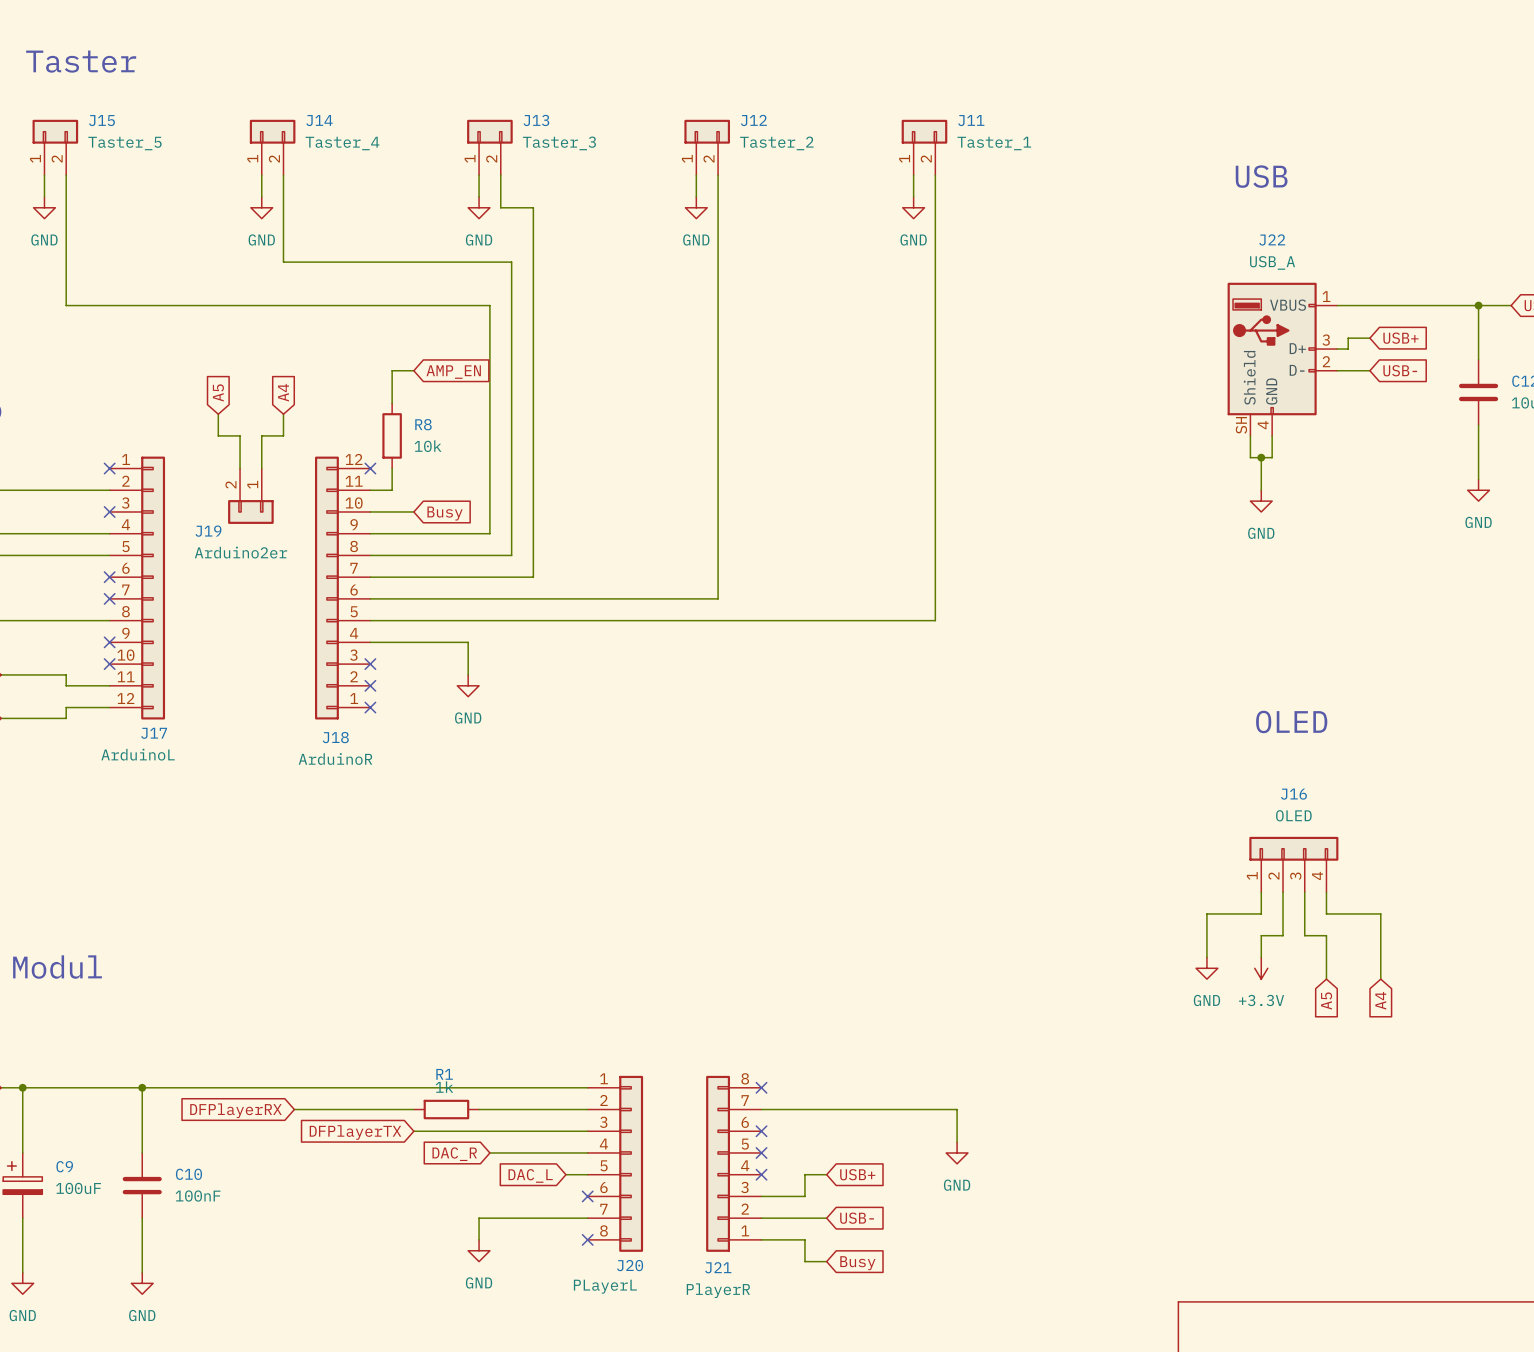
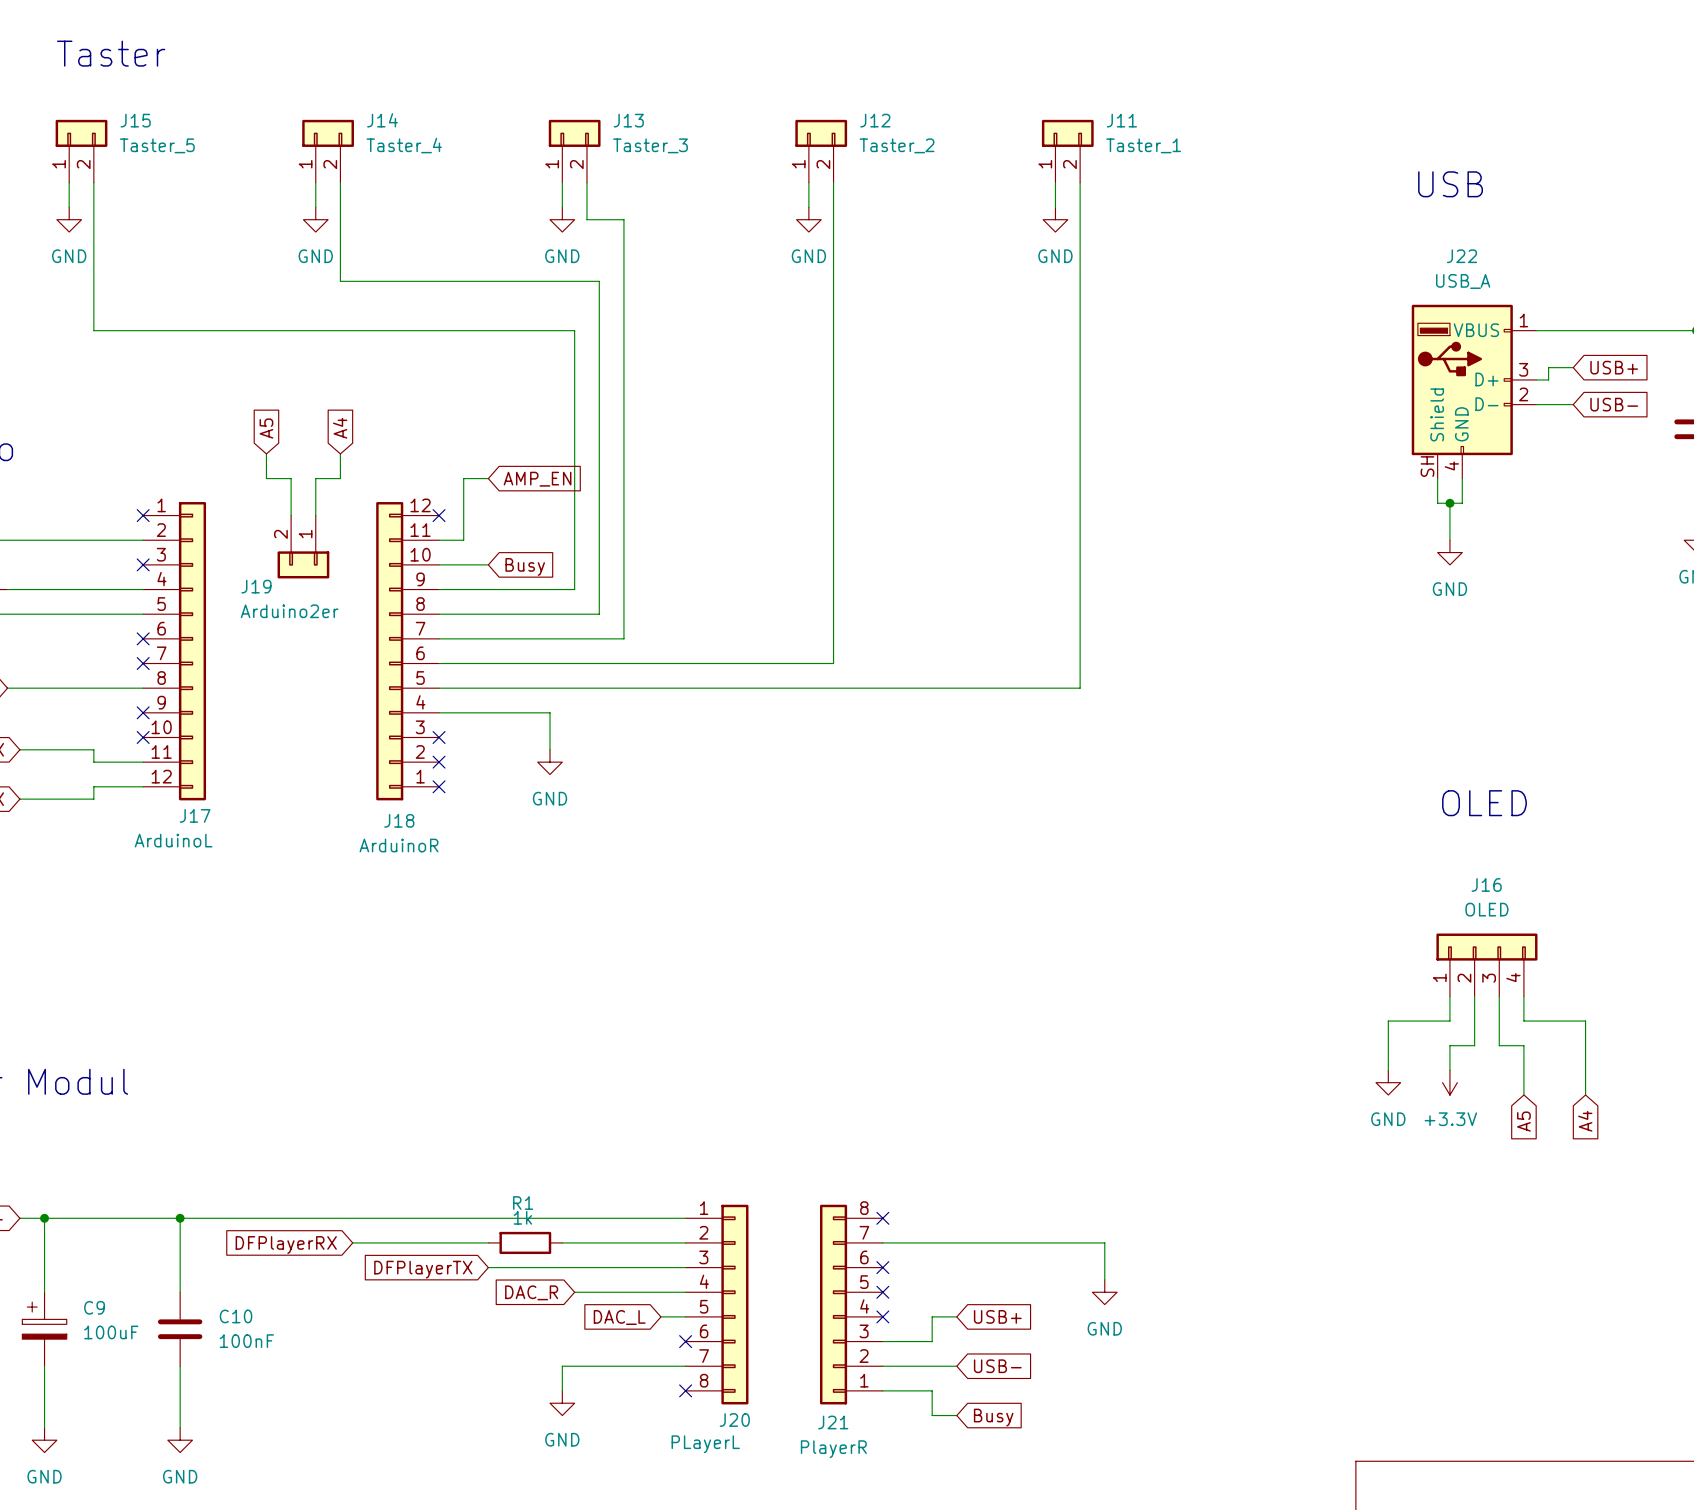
wire: (413, 370) (392, 370) (392, 403) -> (488, 478) (463, 478) (463, 515)
global label position: AMP_EN (453, 372) -> AMP_EN (537, 479)
R8: 10k (392, 435) -> none

